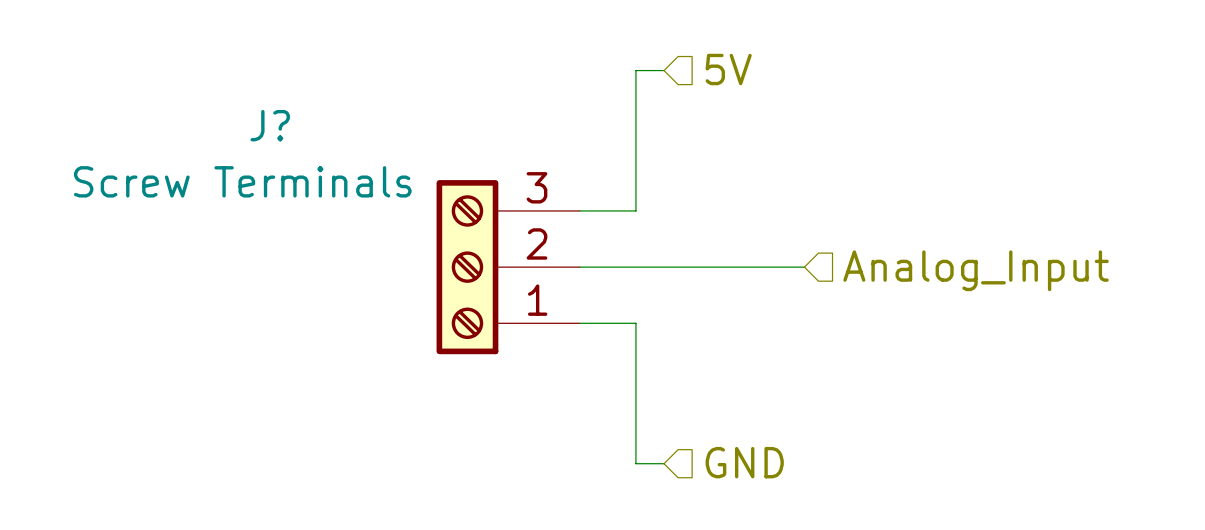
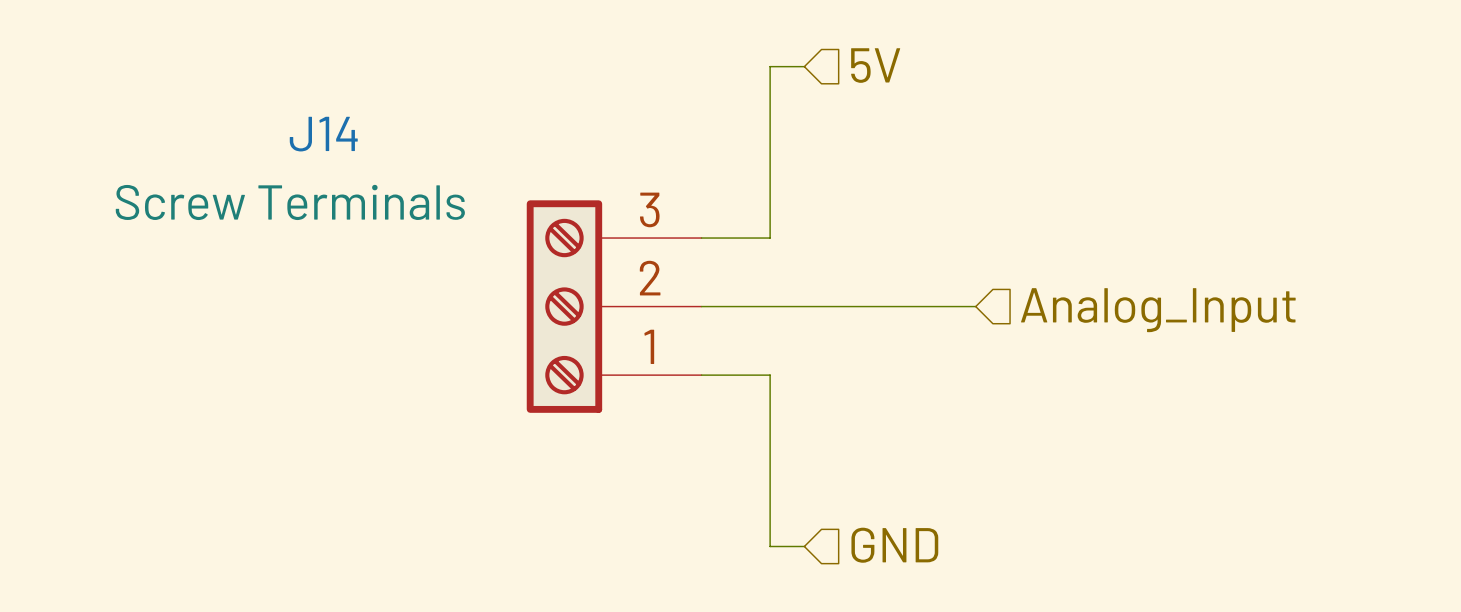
J? name: J? (270, 125) -> J14 (323, 134)

